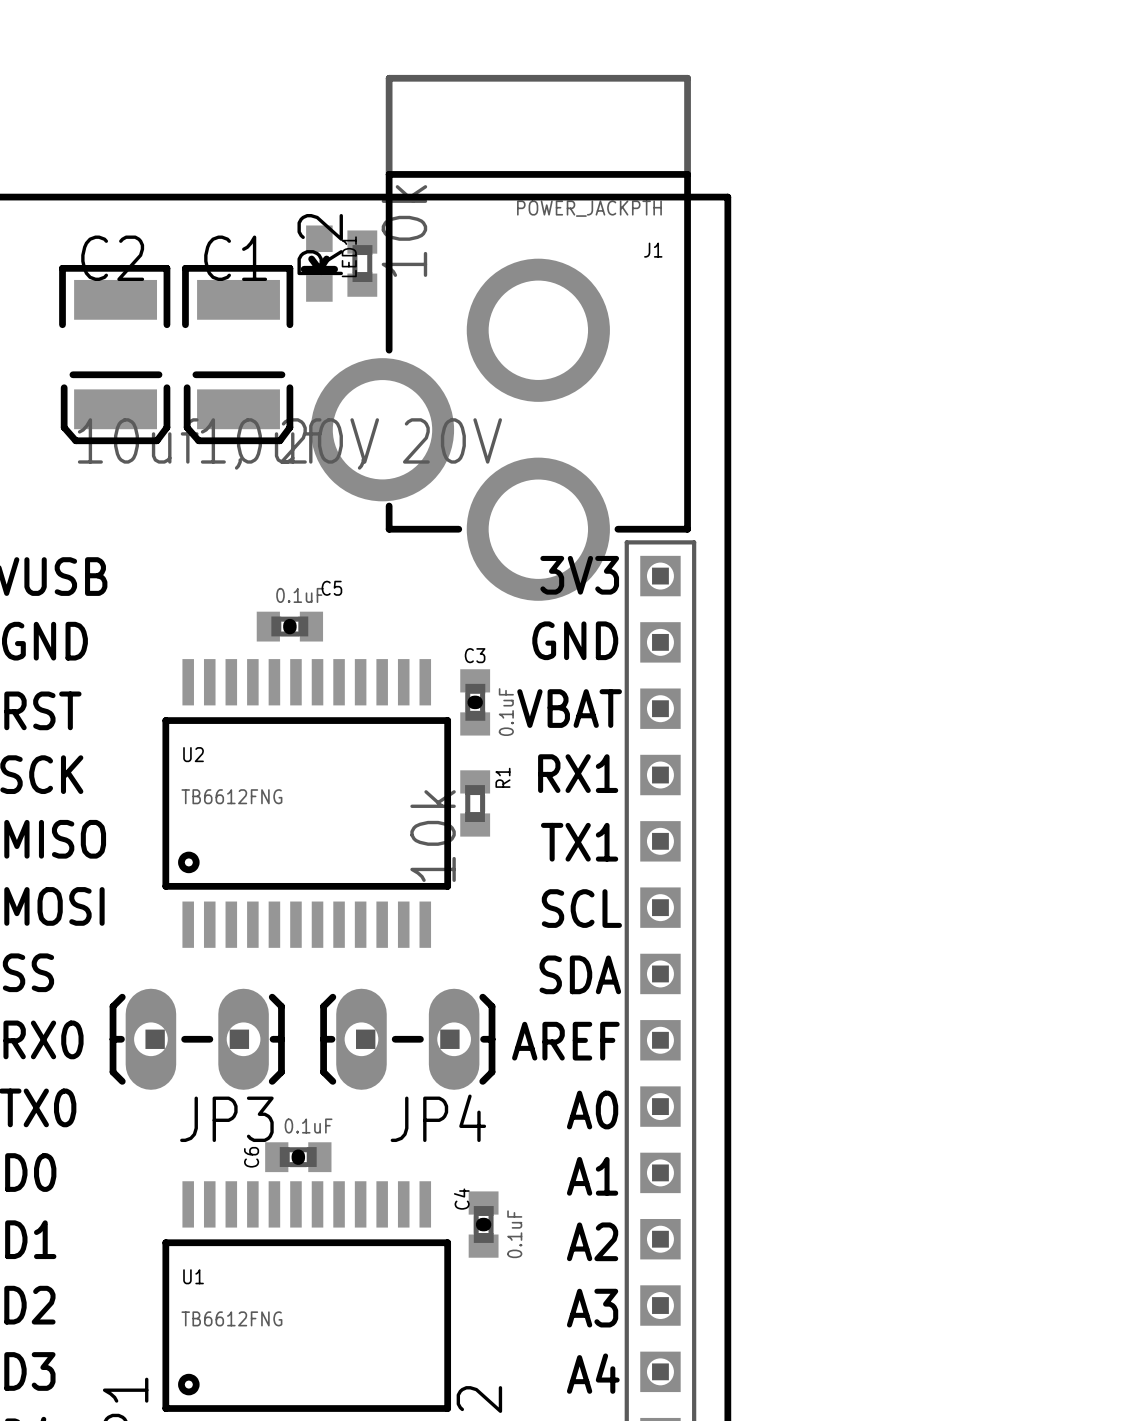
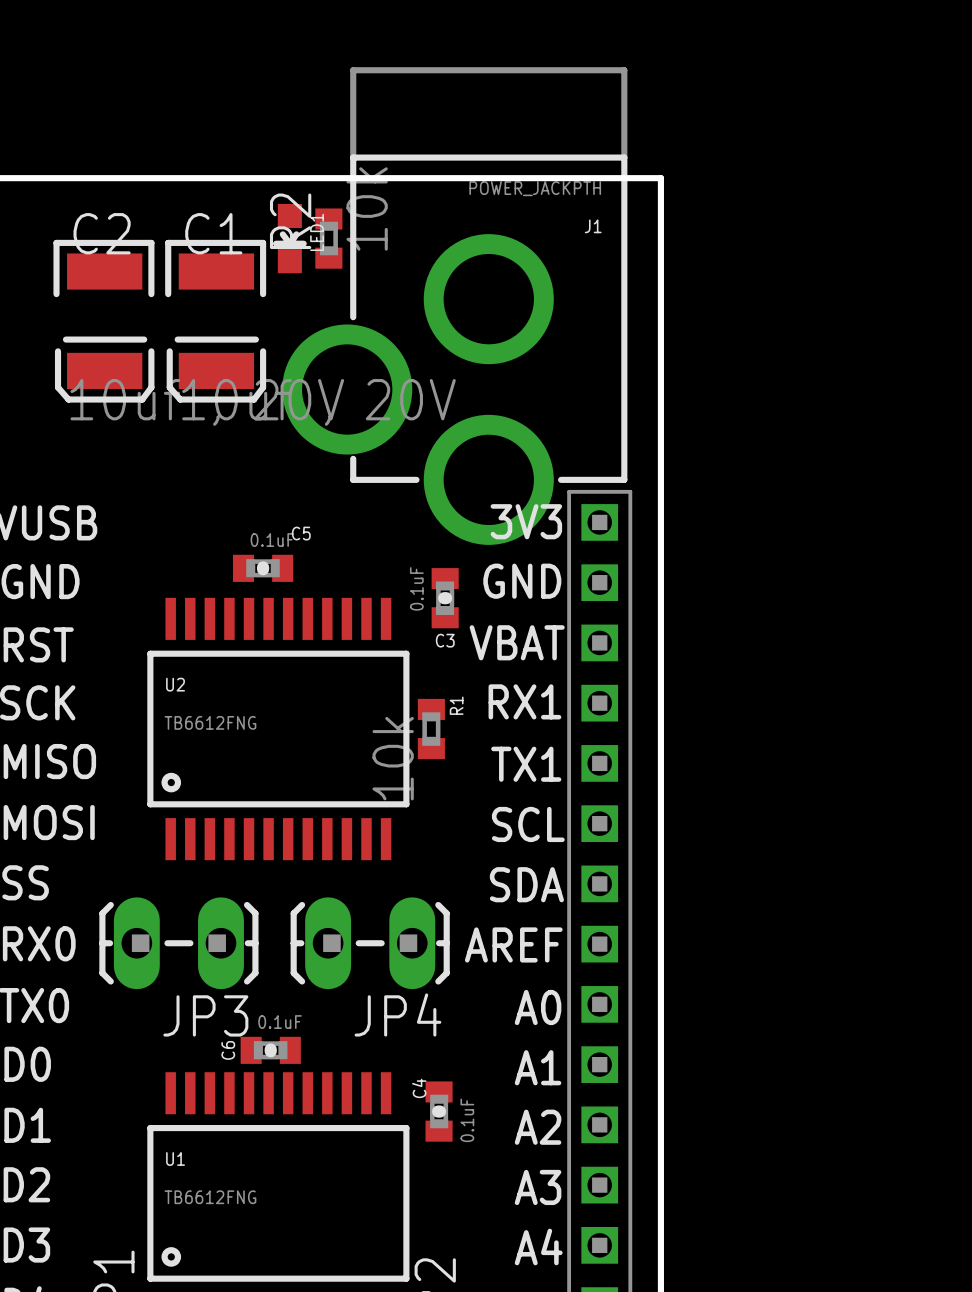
C3 name position: C3 (475, 655) -> C3 (445, 640)
C3 position: (475, 702) -> (445, 598)
C3 value position: 0.1uF (506, 712) -> 0.1uF (416, 588)

